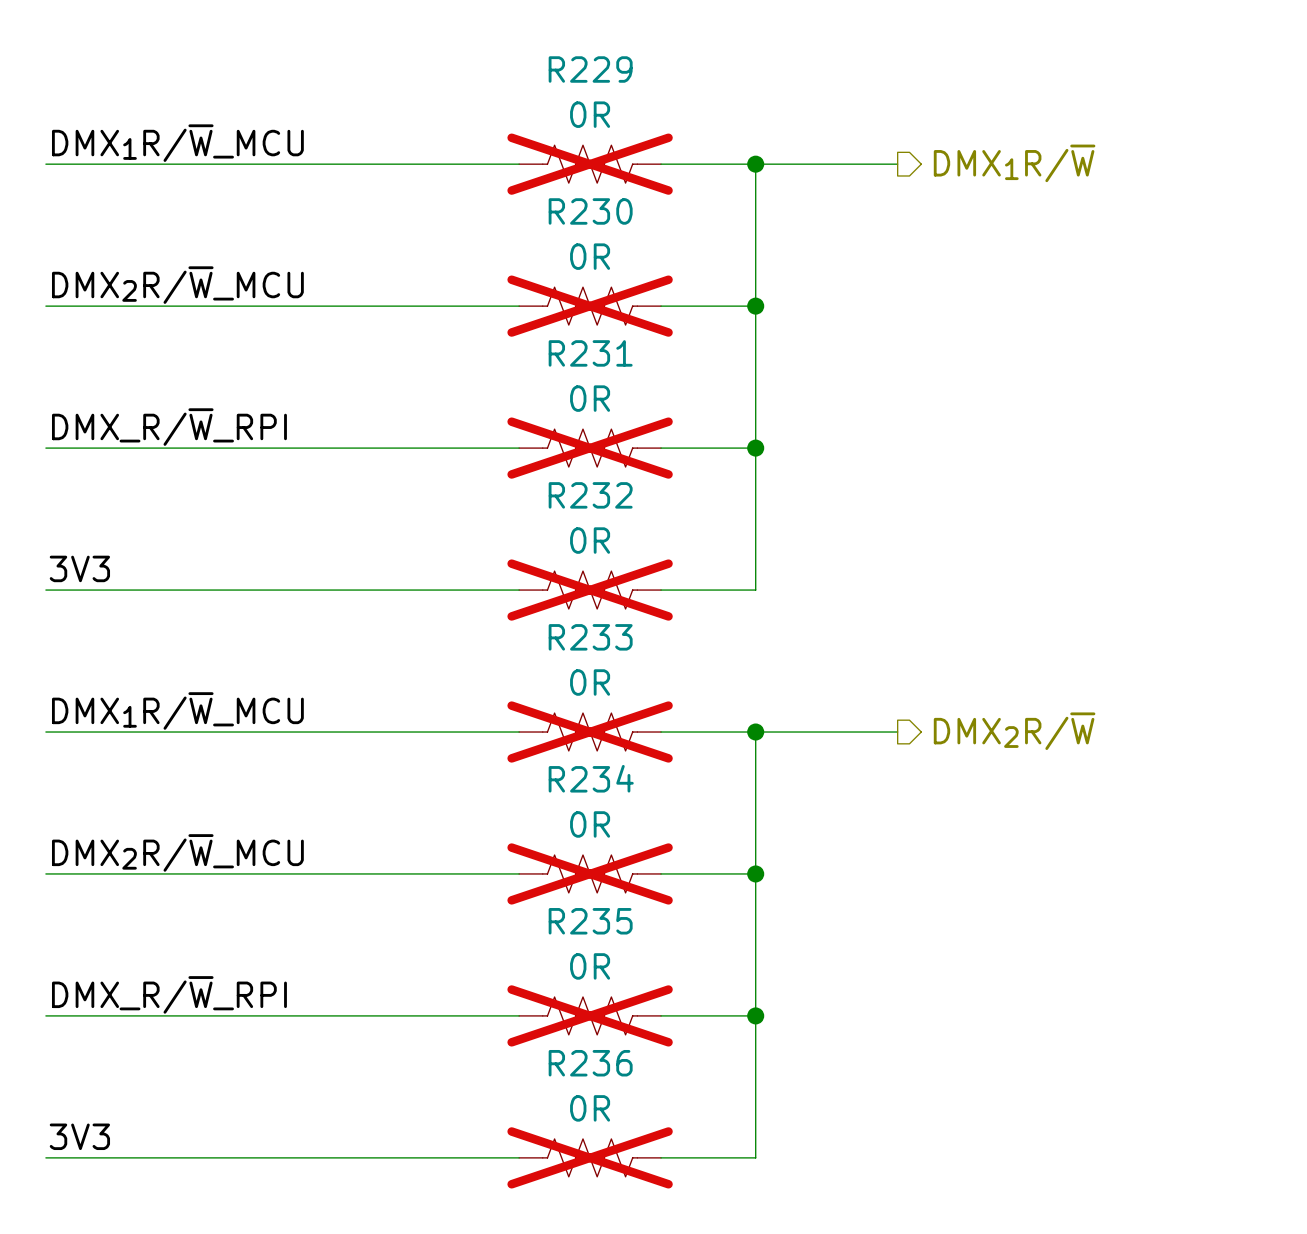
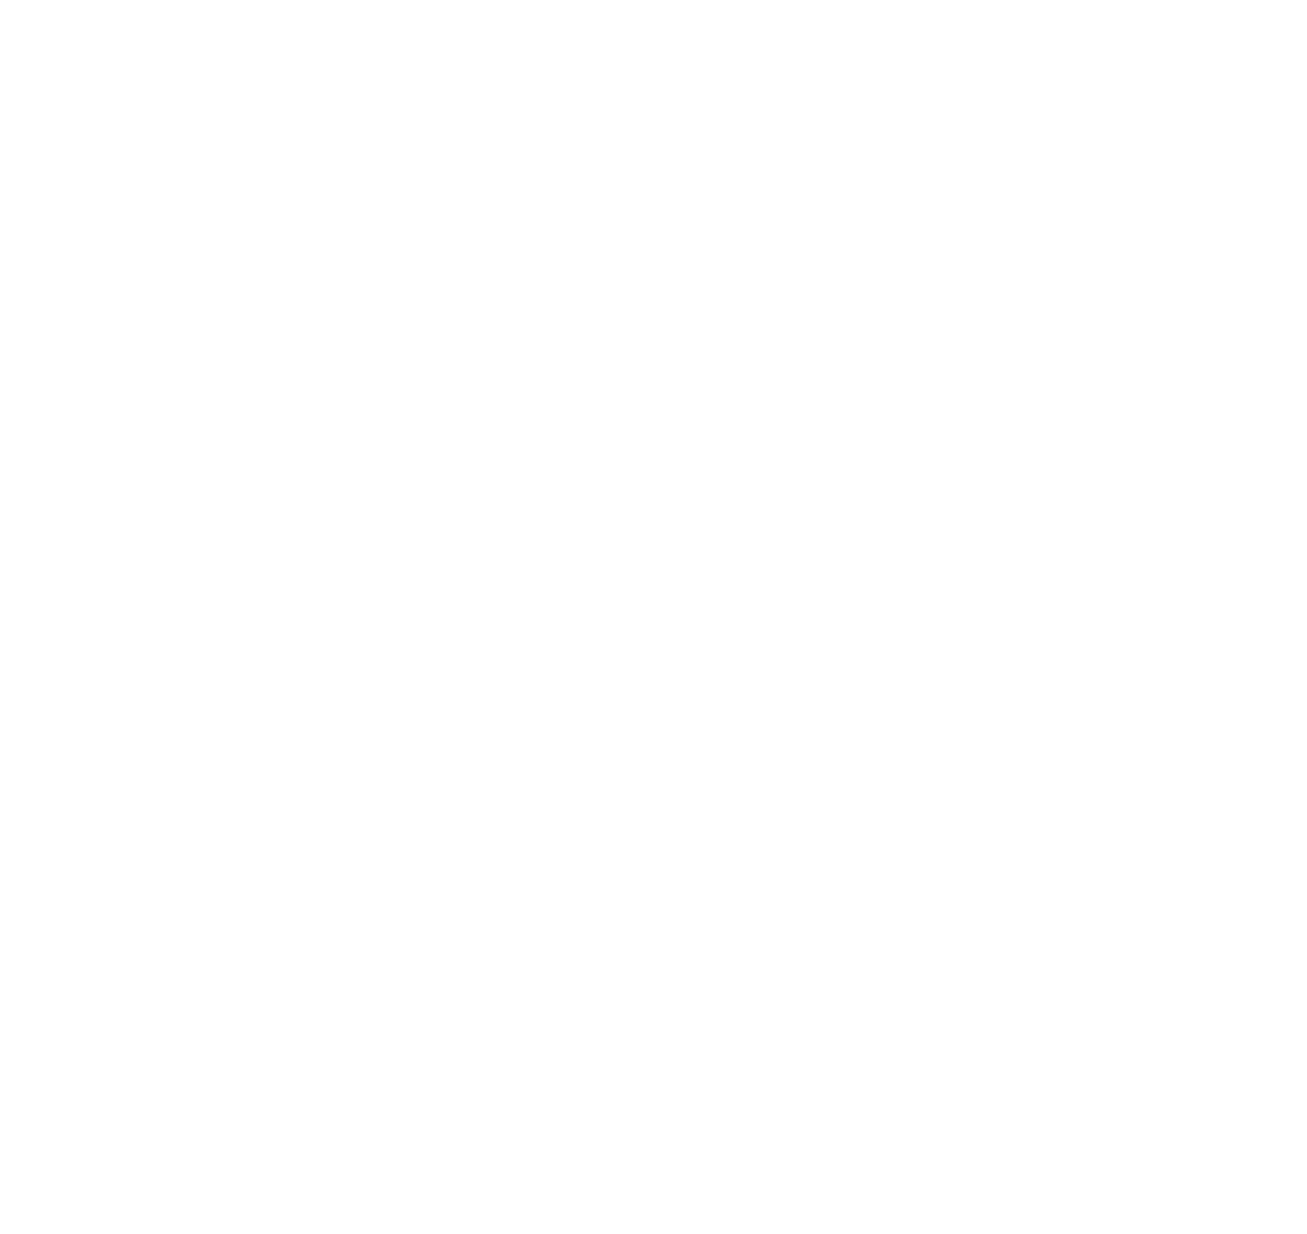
label: DMX1R/~{W}_MCU (177, 143) -> none
hierarchical label: DMX1R/~{W} (1014, 163) -> none
wire: (45, 164) (519, 164) -> none
R229: 0R (590, 164) -> none
wire: (661, 164) (897, 164) -> none
wire: (755, 164) (755, 590) (661, 590) -> none
junction: (755, 164) -> none
label: DMX2R/~{W}_MCU (177, 285) -> none
wire: (45, 306) (519, 306) -> none
R230: 0R (590, 306) -> none
wire: (661, 306) (755, 306) -> none
junction: (755, 306) -> none
label: DMX_R/~{W}_RPI (169, 427) -> none
wire: (45, 448) (519, 448) -> none
R231: 0R (590, 448) -> none
wire: (661, 448) (755, 448) -> none
junction: (755, 448) -> none
label: 3V3 (79, 568) -> none
wire: (45, 590) (519, 590) -> none
R232: 0R (590, 590) -> none
label: DMX1R/~{W}_MCU (177, 710) -> none
hierarchical label: DMX2R/~{W} (1014, 731) -> none
wire: (45, 732) (519, 732) -> none
R233: 0R (590, 732) -> none
wire: (661, 732) (897, 732) -> none
wire: (755, 732) (755, 1157) (661, 1157) -> none
junction: (755, 732) -> none
label: DMX2R/~{W}_MCU (177, 852) -> none
wire: (45, 873) (519, 873) -> none
R234: 0R (590, 873) -> none
wire: (661, 873) (755, 873) -> none
junction: (755, 873) -> none
label: DMX_R/~{W}_RPI (169, 994) -> none
wire: (45, 1015) (519, 1015) -> none
R235: 0R (590, 1015) -> none
wire: (661, 1015) (755, 1015) -> none
junction: (755, 1015) -> none
label: 3V3 (79, 1136) -> none
wire: (45, 1157) (519, 1157) -> none
R236: 0R (590, 1157) -> none

